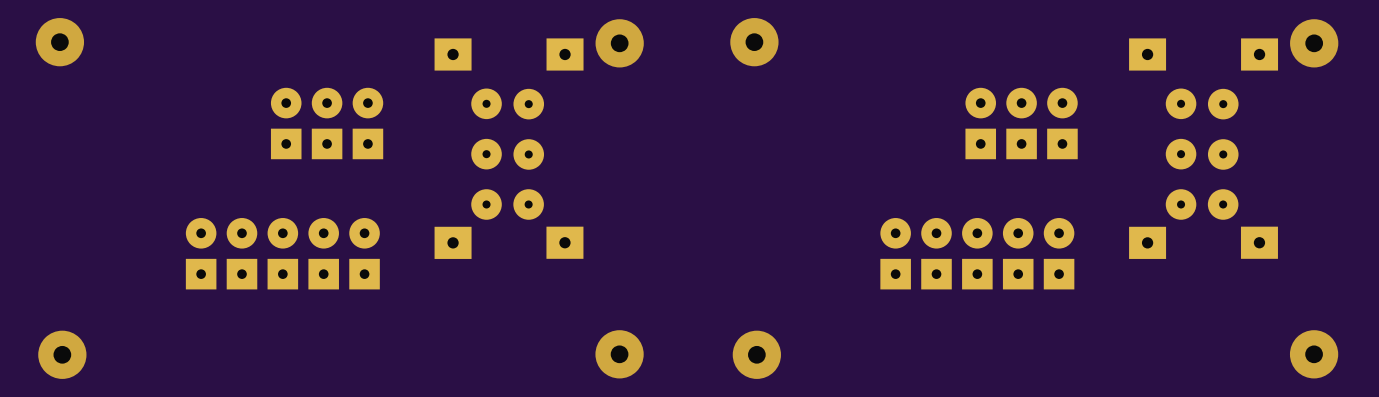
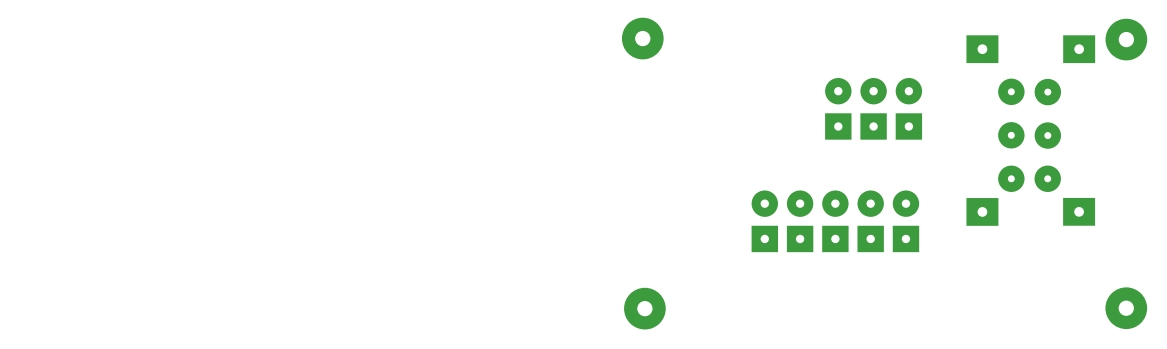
via: (59, 42) -> none
via: (619, 43) -> none
part: (327, 123) -> none
part: (509, 148) -> none
part: (282, 253) -> none
via: (62, 354) -> none
via: (619, 354) -> none

